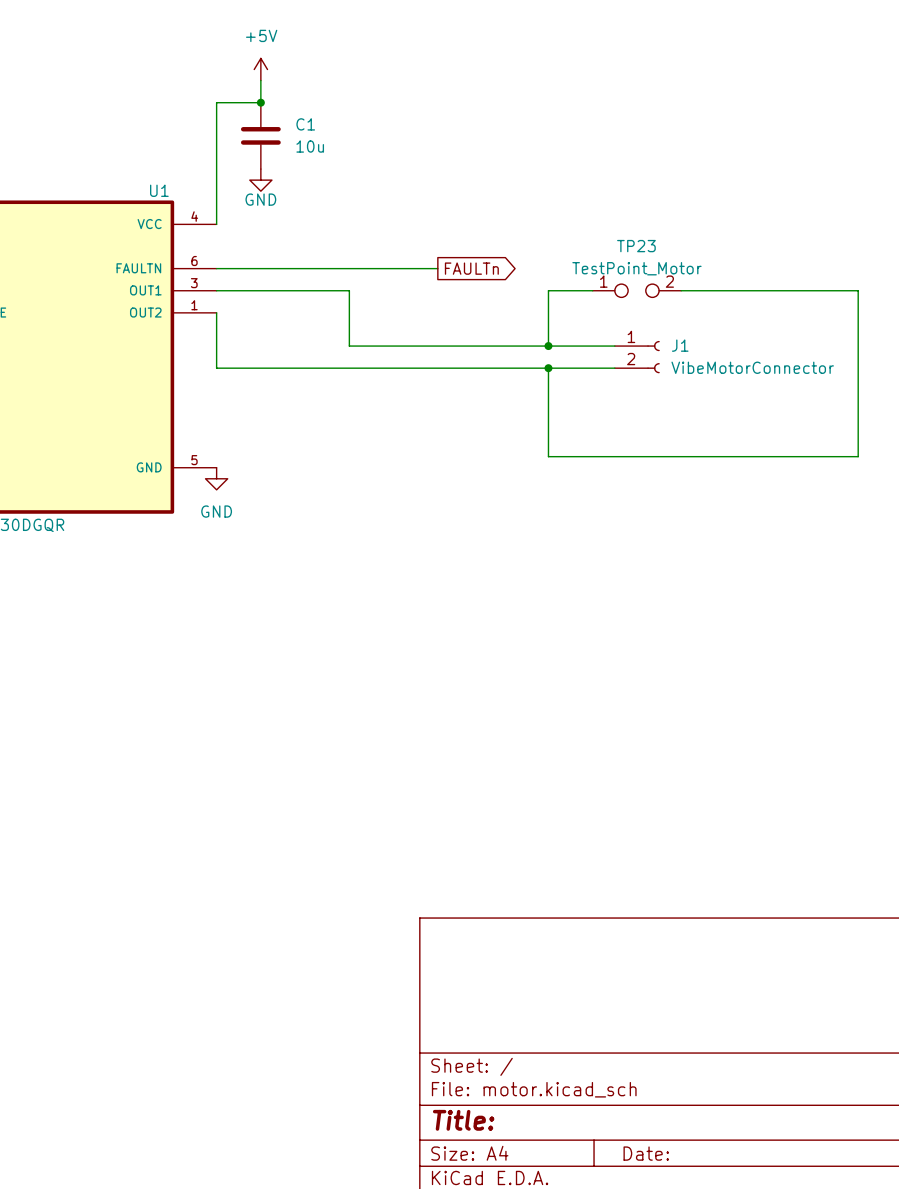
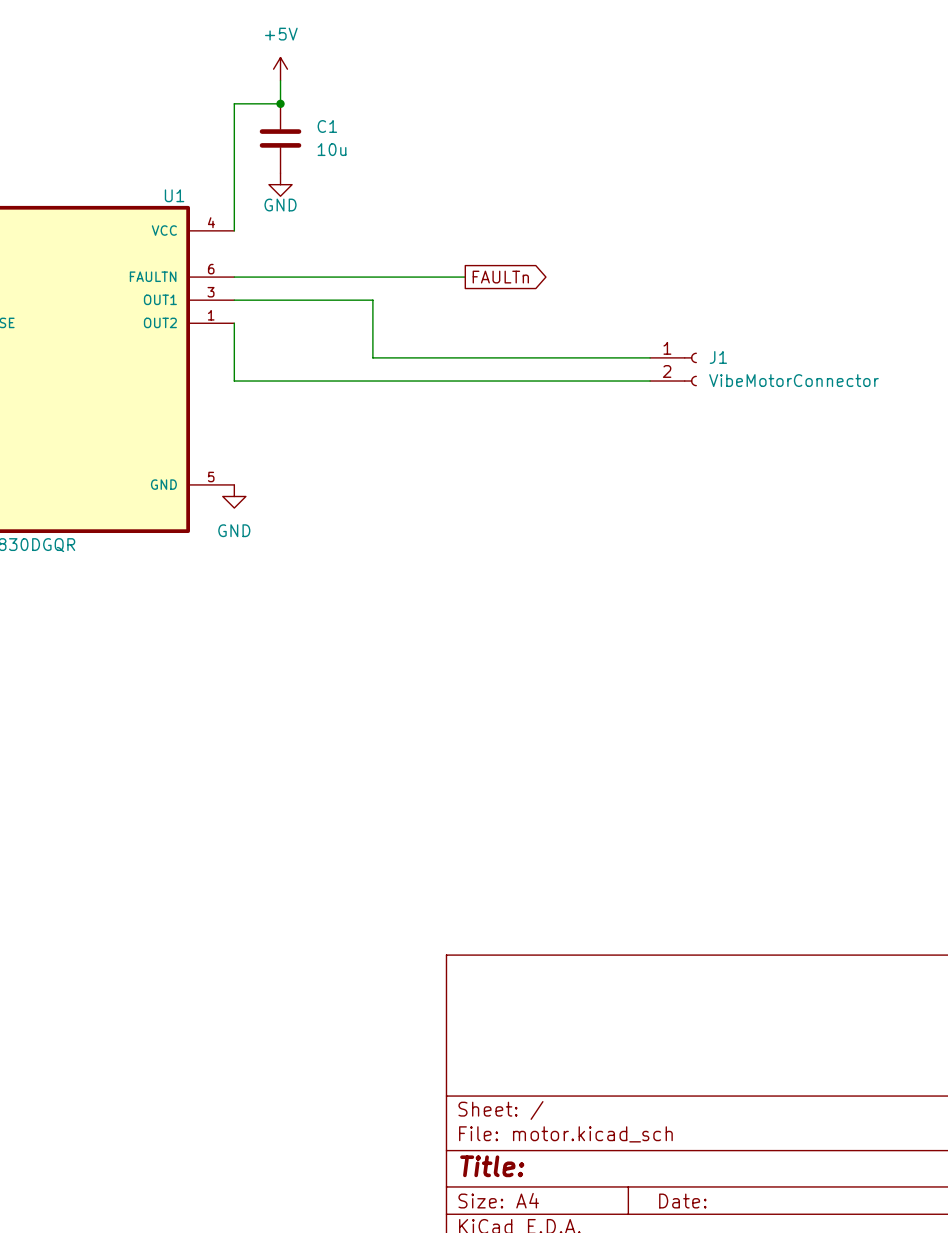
wire: (592, 290) (548, 290) (548, 346) -> none
TP23: TestPoint_Motor (636, 290) -> none
wire: (681, 290) (858, 290) (858, 456) (548, 456) (548, 368) -> none
junction: (548, 346) -> none
junction: (548, 368) -> none

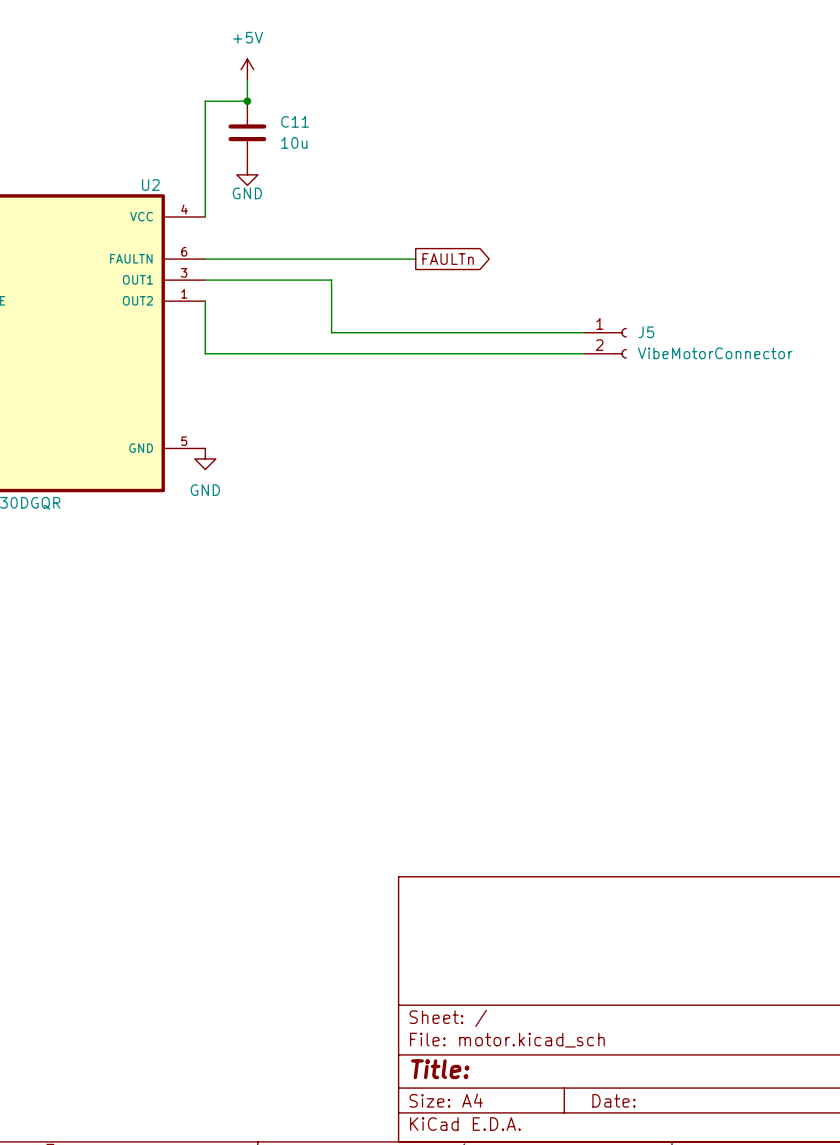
C1 name: C1 (327, 126) -> C11 (295, 121)
U1 name: U1 (174, 195) -> U2 (150, 185)
J1 name: J1 (718, 357) -> J5 (646, 332)

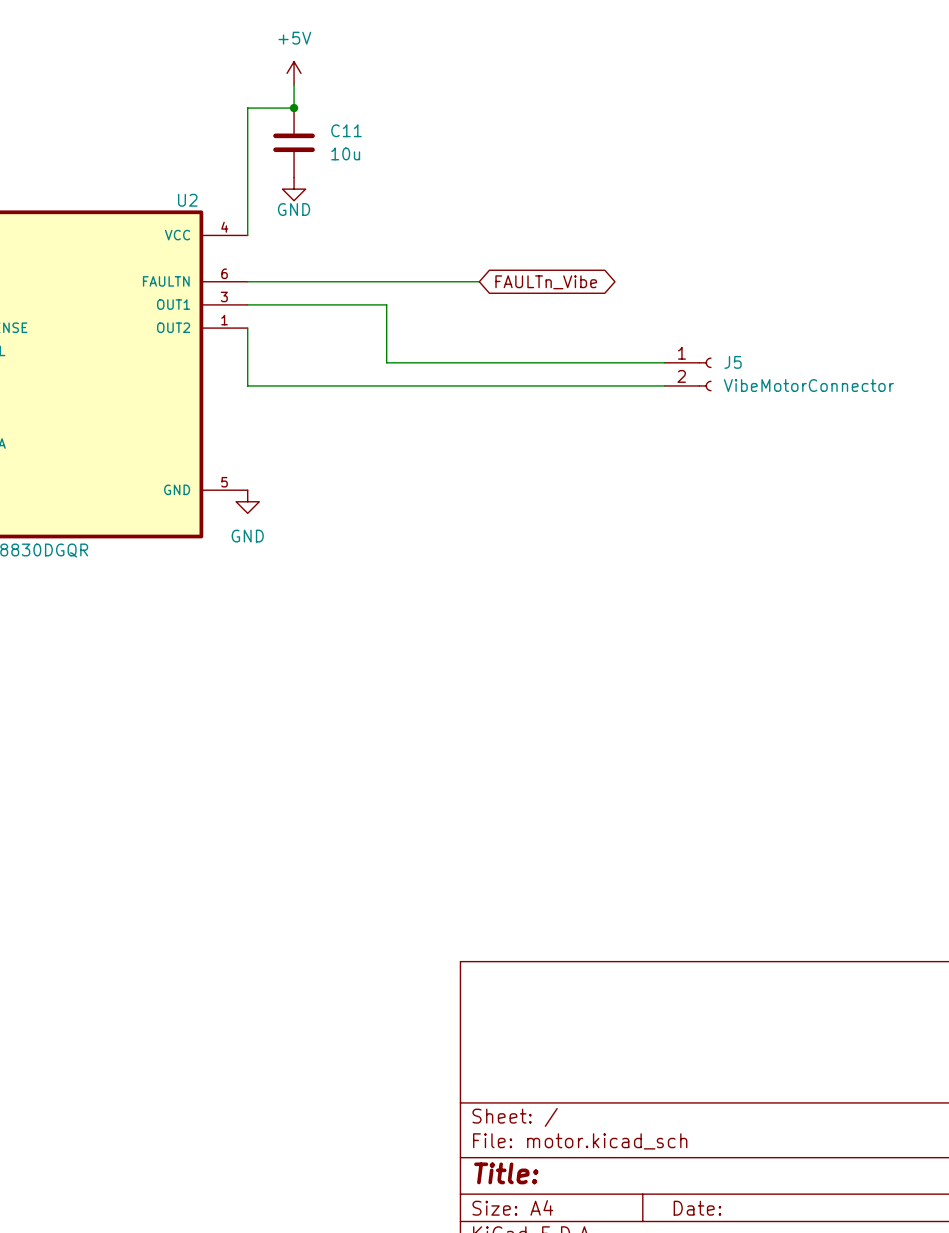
global label shape: output (448, 259) -> bidirectional (546, 282)
global label: FAULTn (448, 259) -> FAULTn_Vibe (546, 282)

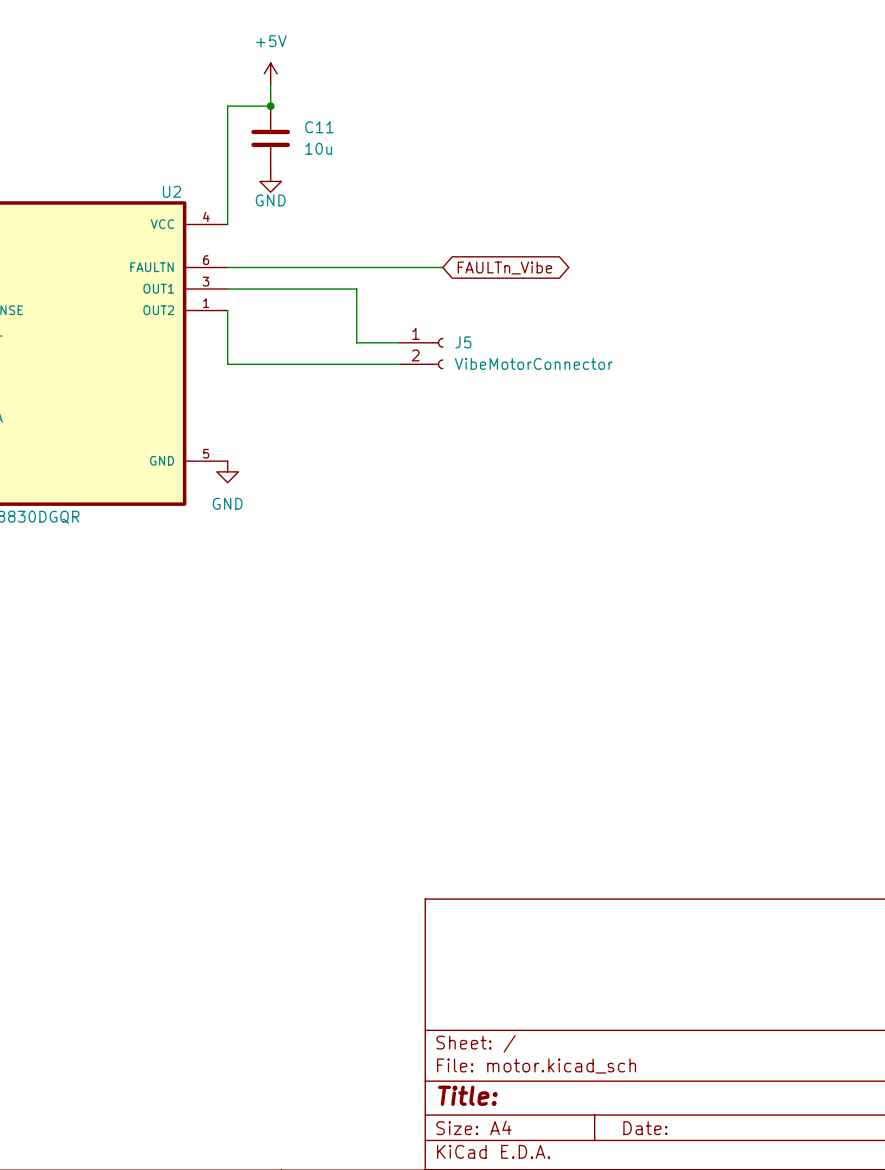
wire: (432, 362) (664, 362) -> none
J5 position: (688, 374) -> (421, 353)
wire: (432, 385) (664, 385) -> none

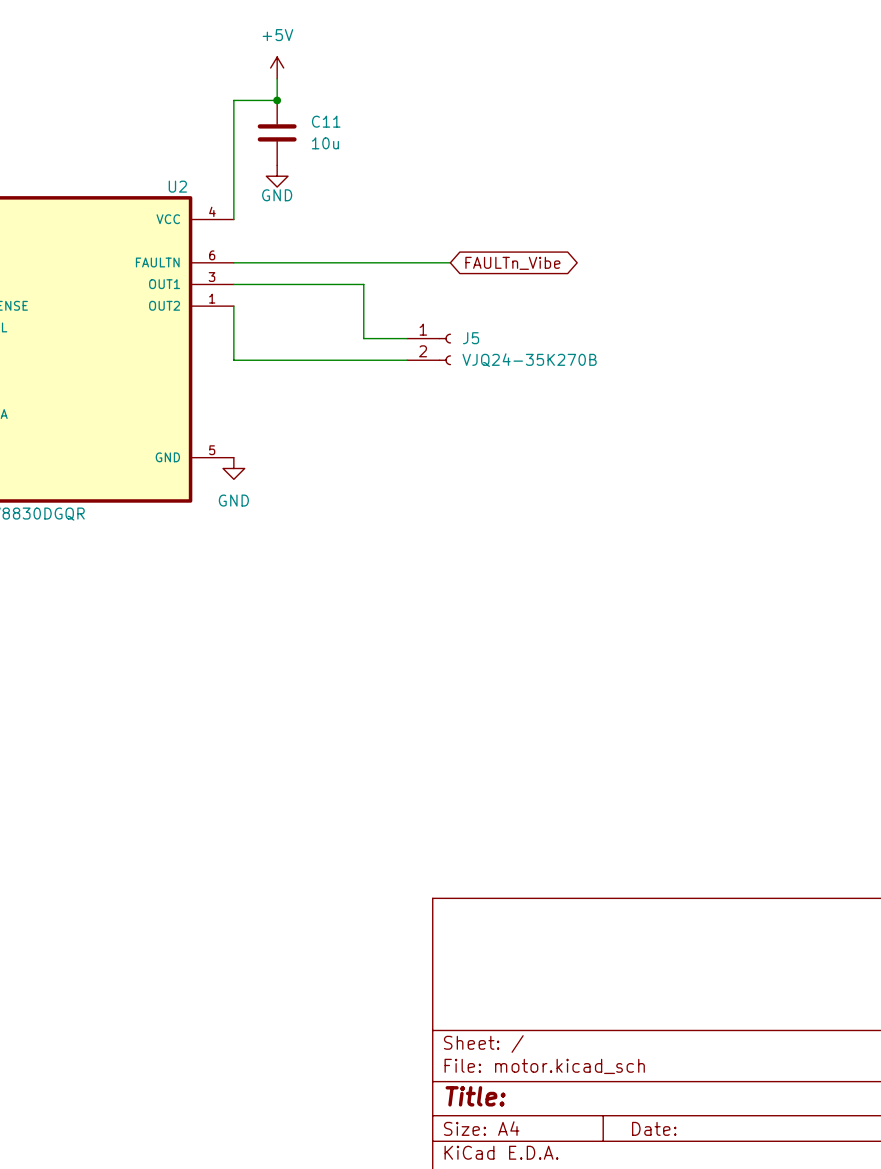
J5 value: VibeMotorConnector (533, 363) -> VJQ24-35K270B (529, 360)

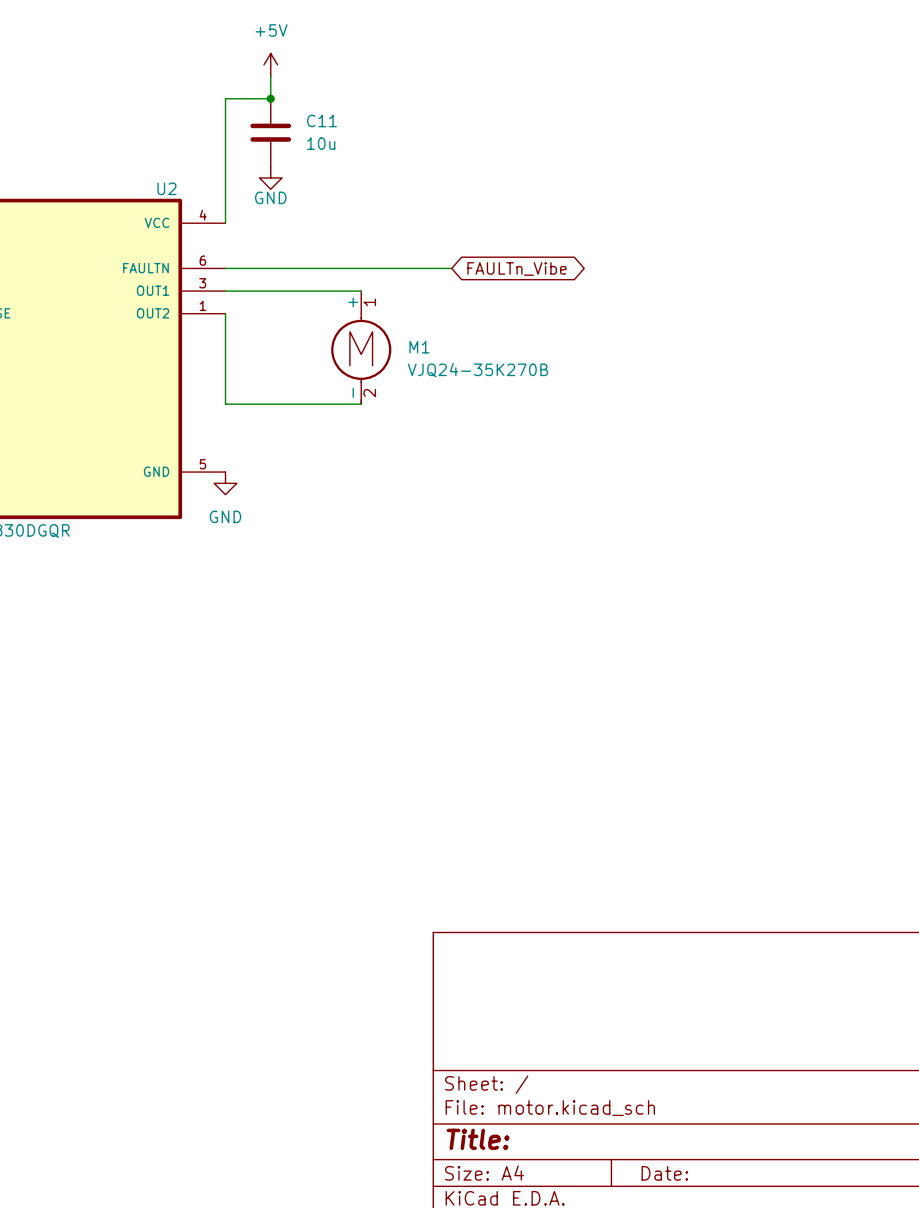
wire: (363, 284) (363, 338) (407, 338) -> none
M1: none -> VJQ24-35K270B (361, 347)
J5: VJQ24-35K270B (429, 349) -> none
wire: (233, 360) (407, 360) -> (225, 370) (225, 404) (361, 404)

